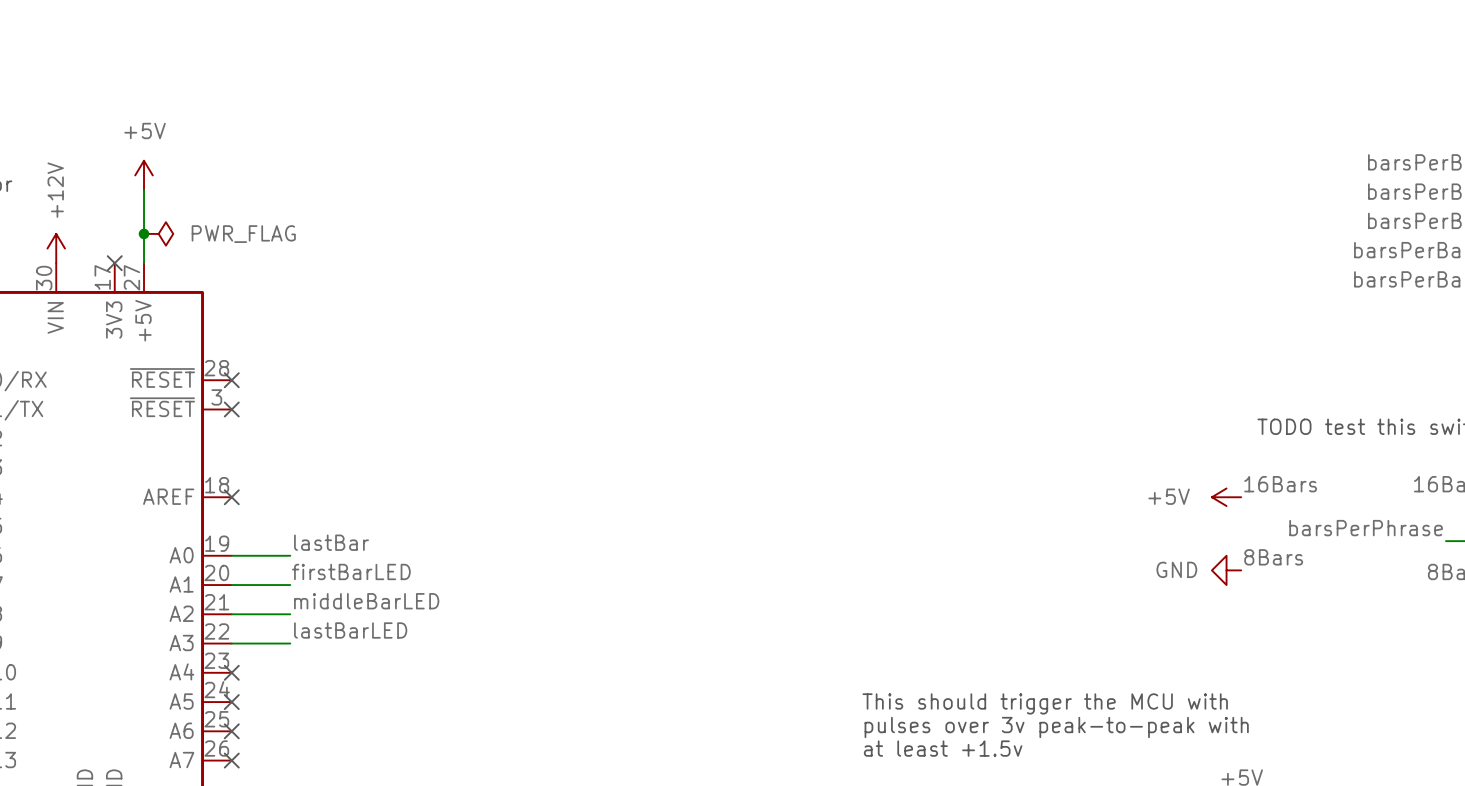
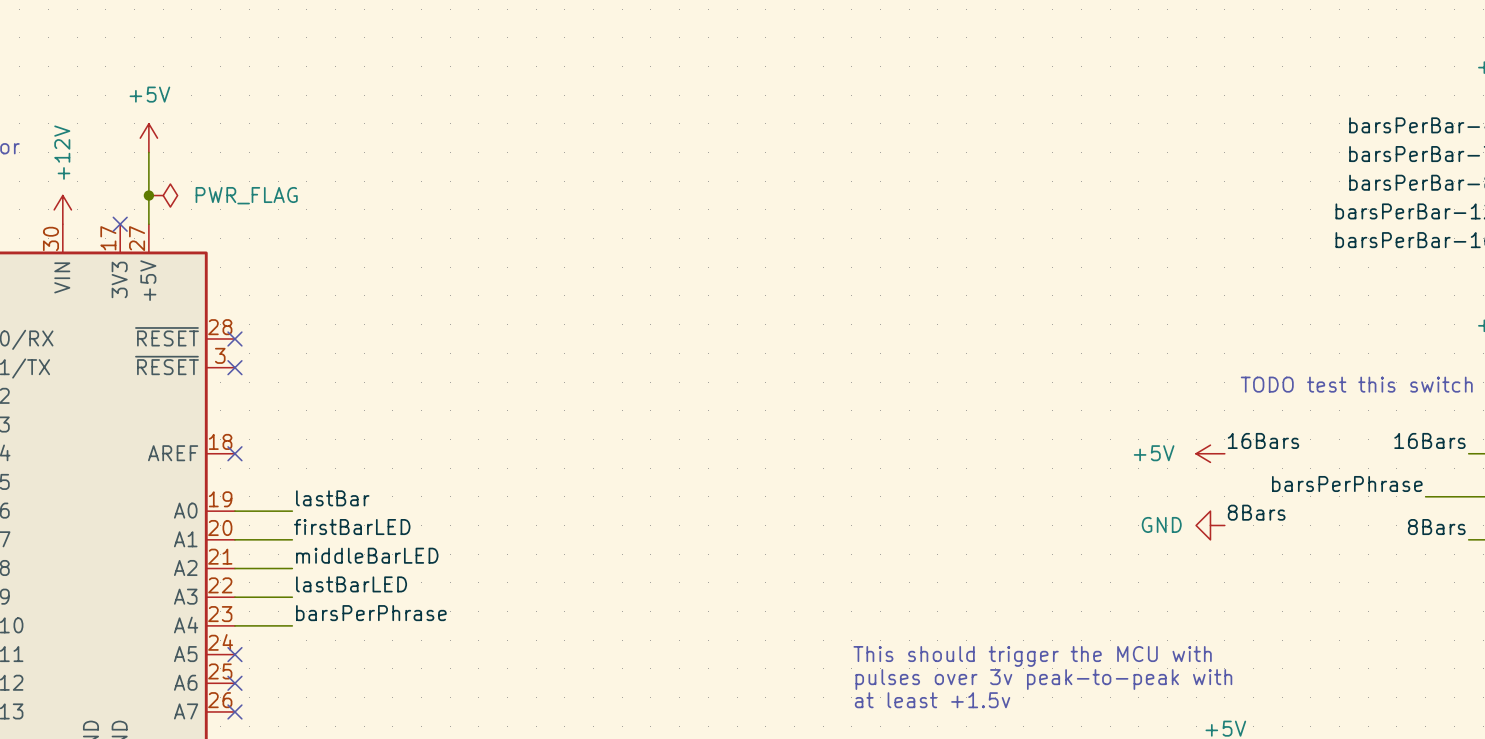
label: none -> barsPerPhrase (371, 613)
wire: none -> (234, 625) (292, 625)
no-connect mark: (231, 672) -> none

